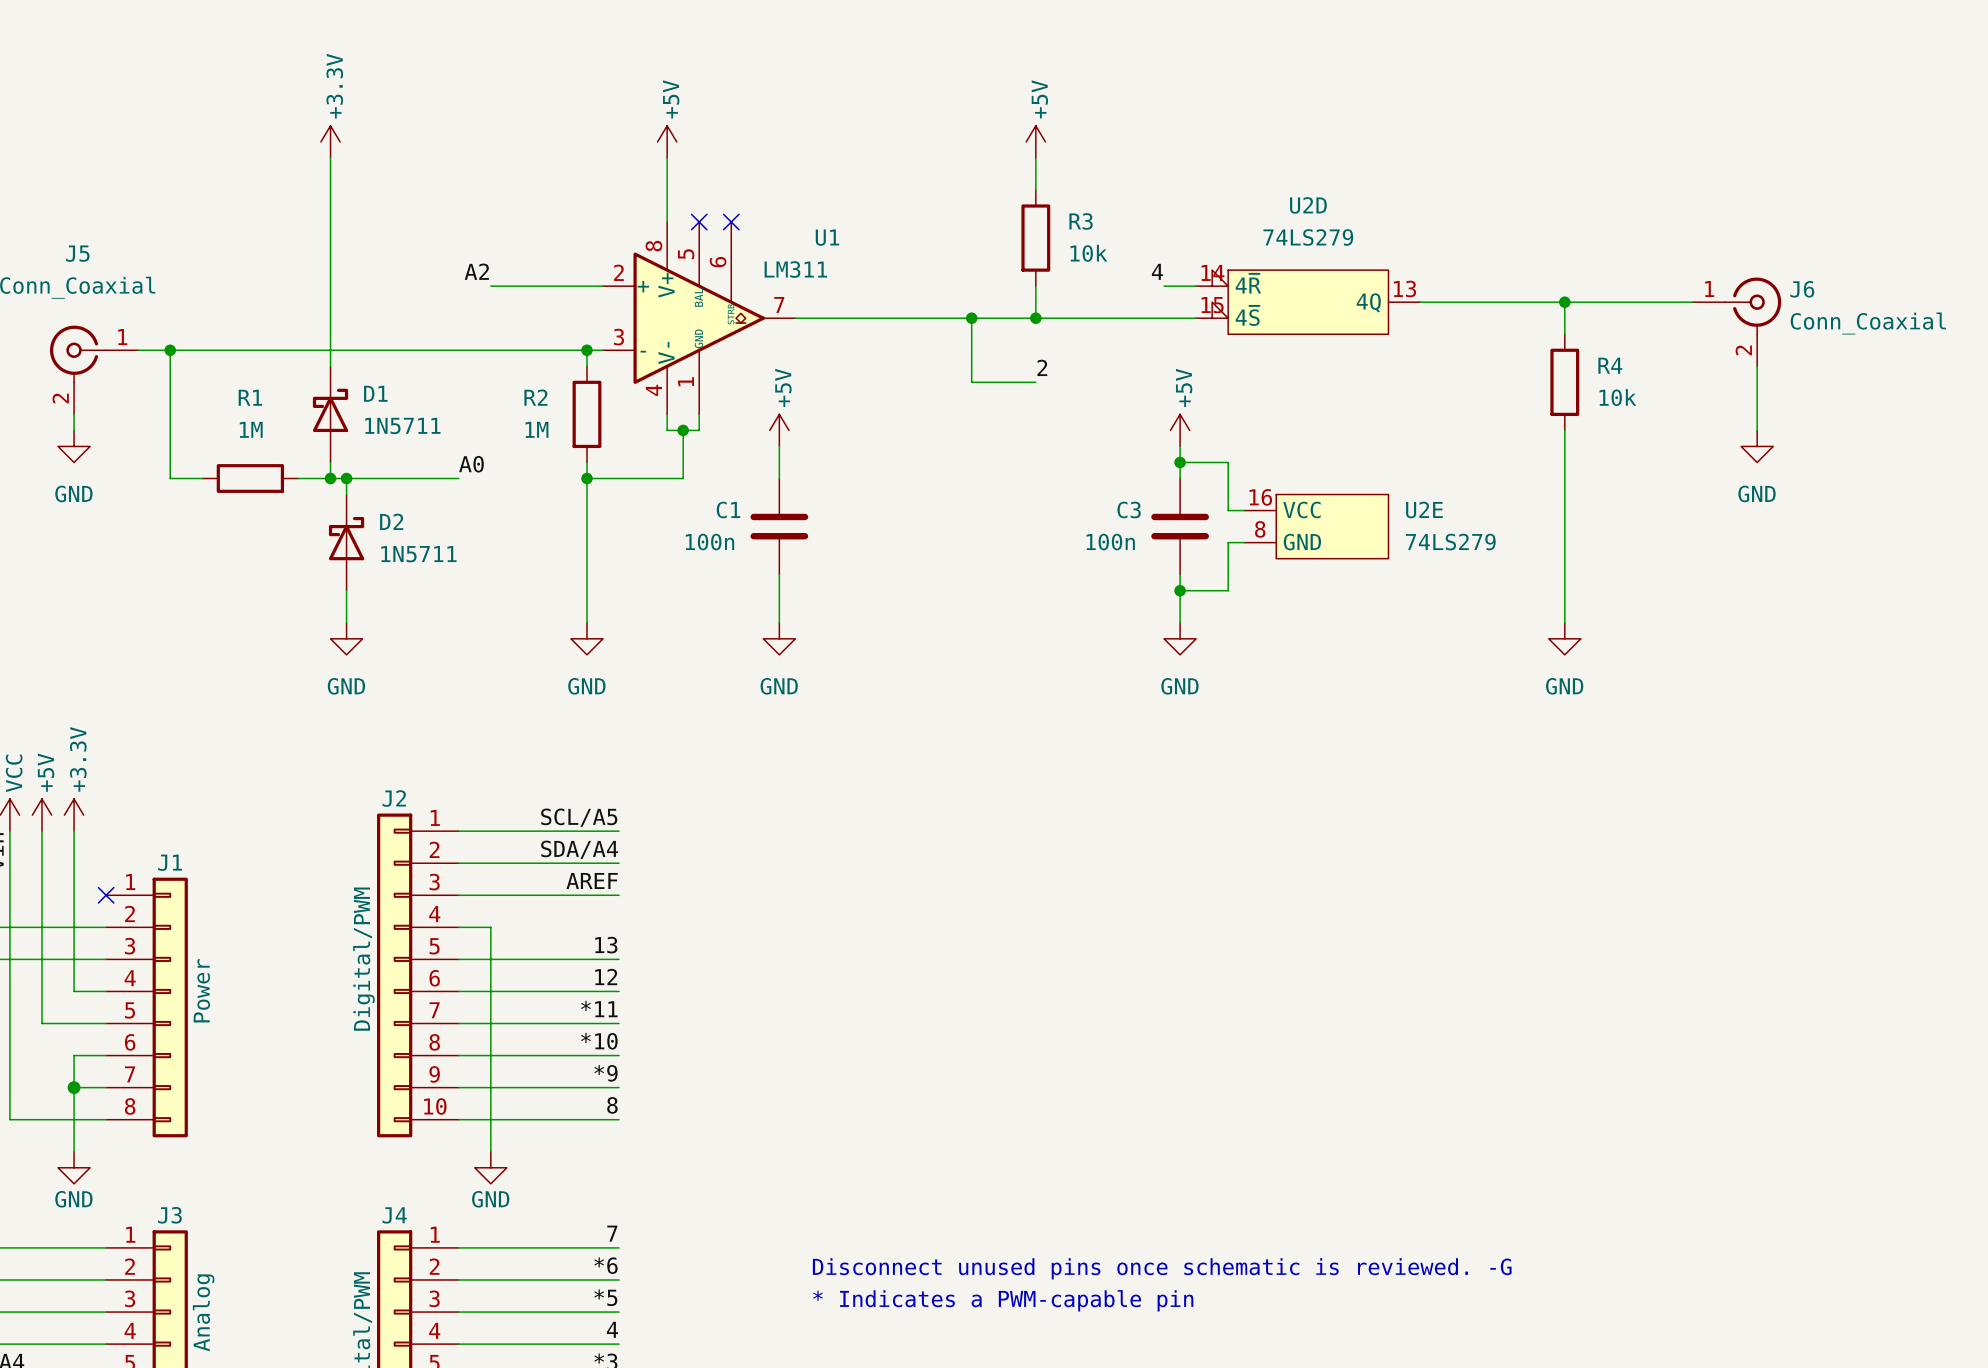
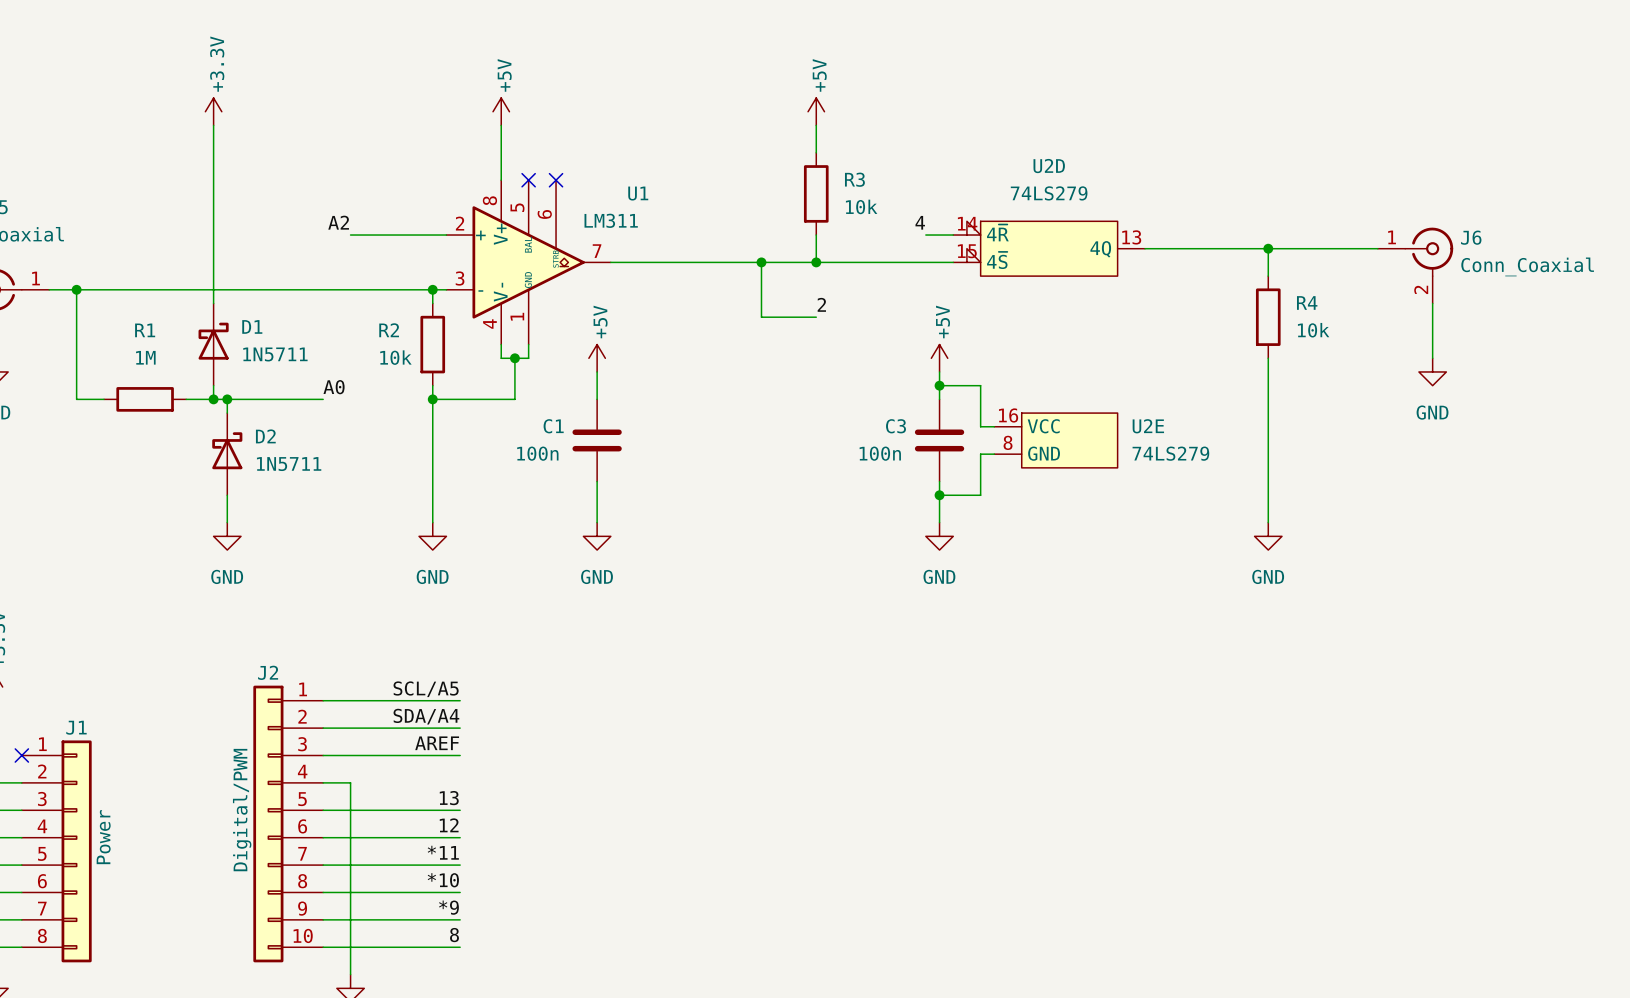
R2 value: 1M (536, 429) -> 10k (395, 357)

